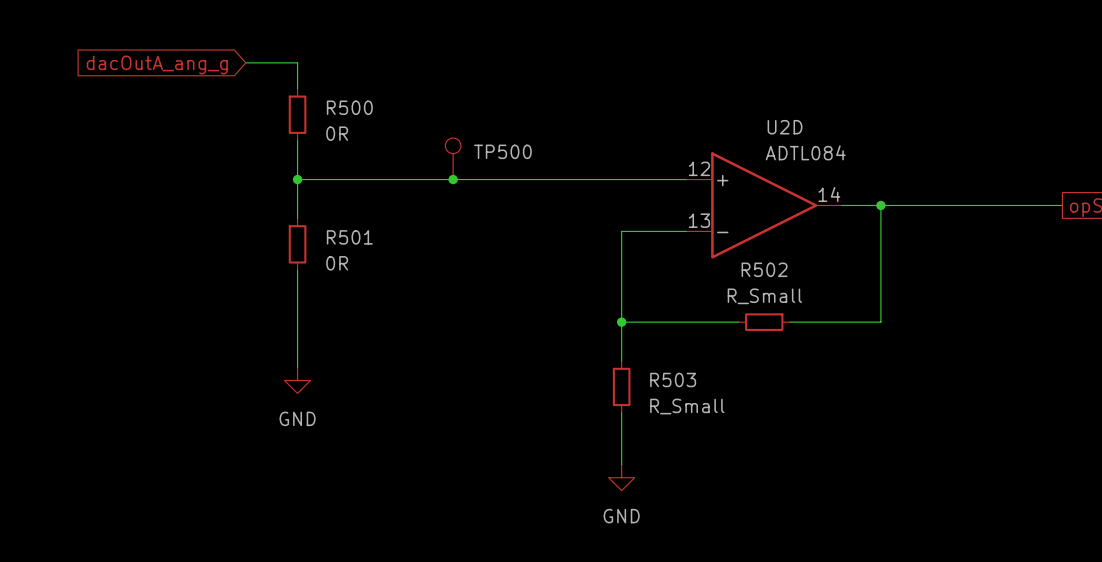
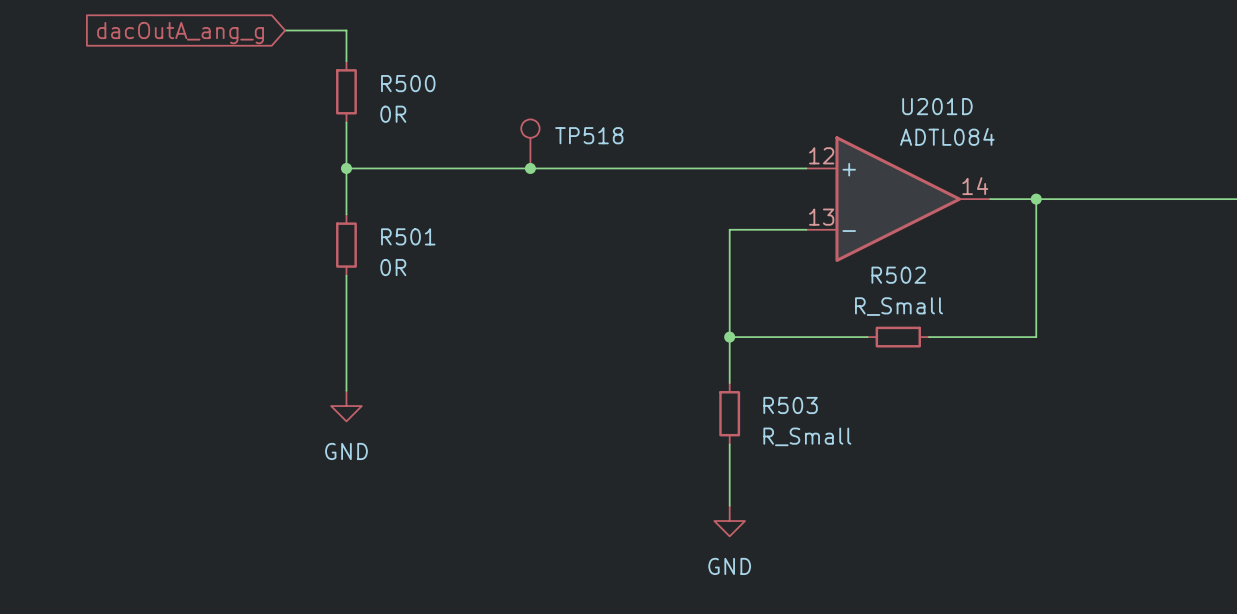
U2D name: U2D (785, 127) -> U201D (937, 106)
TP500 name: TP500 (502, 151) -> TP518 (589, 135)

